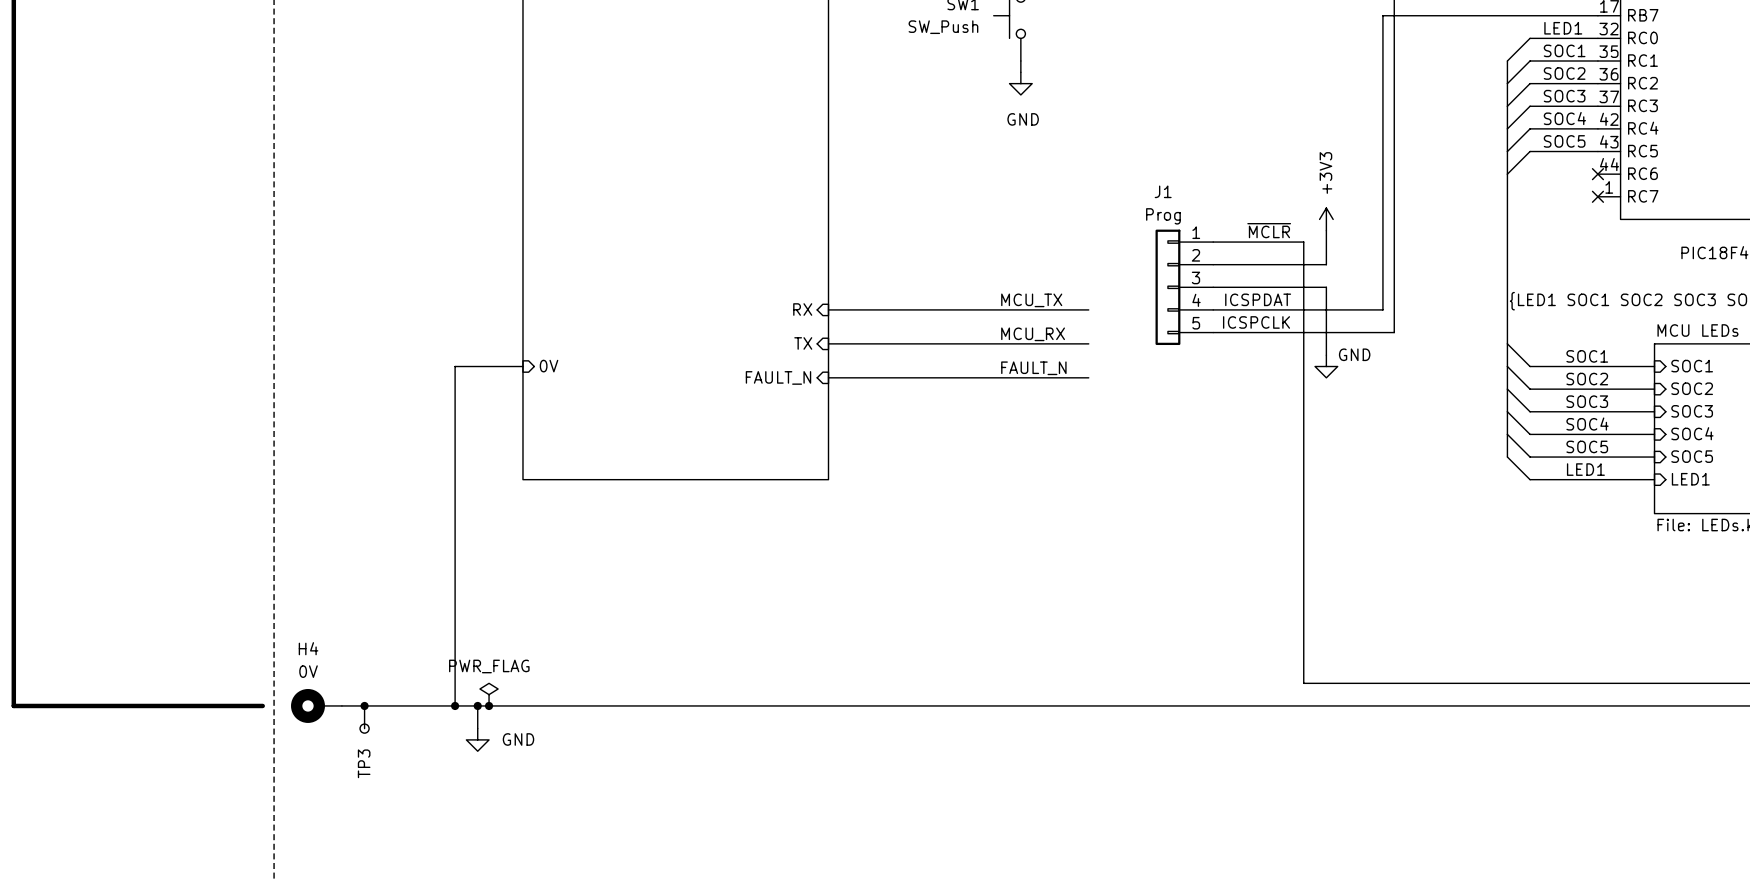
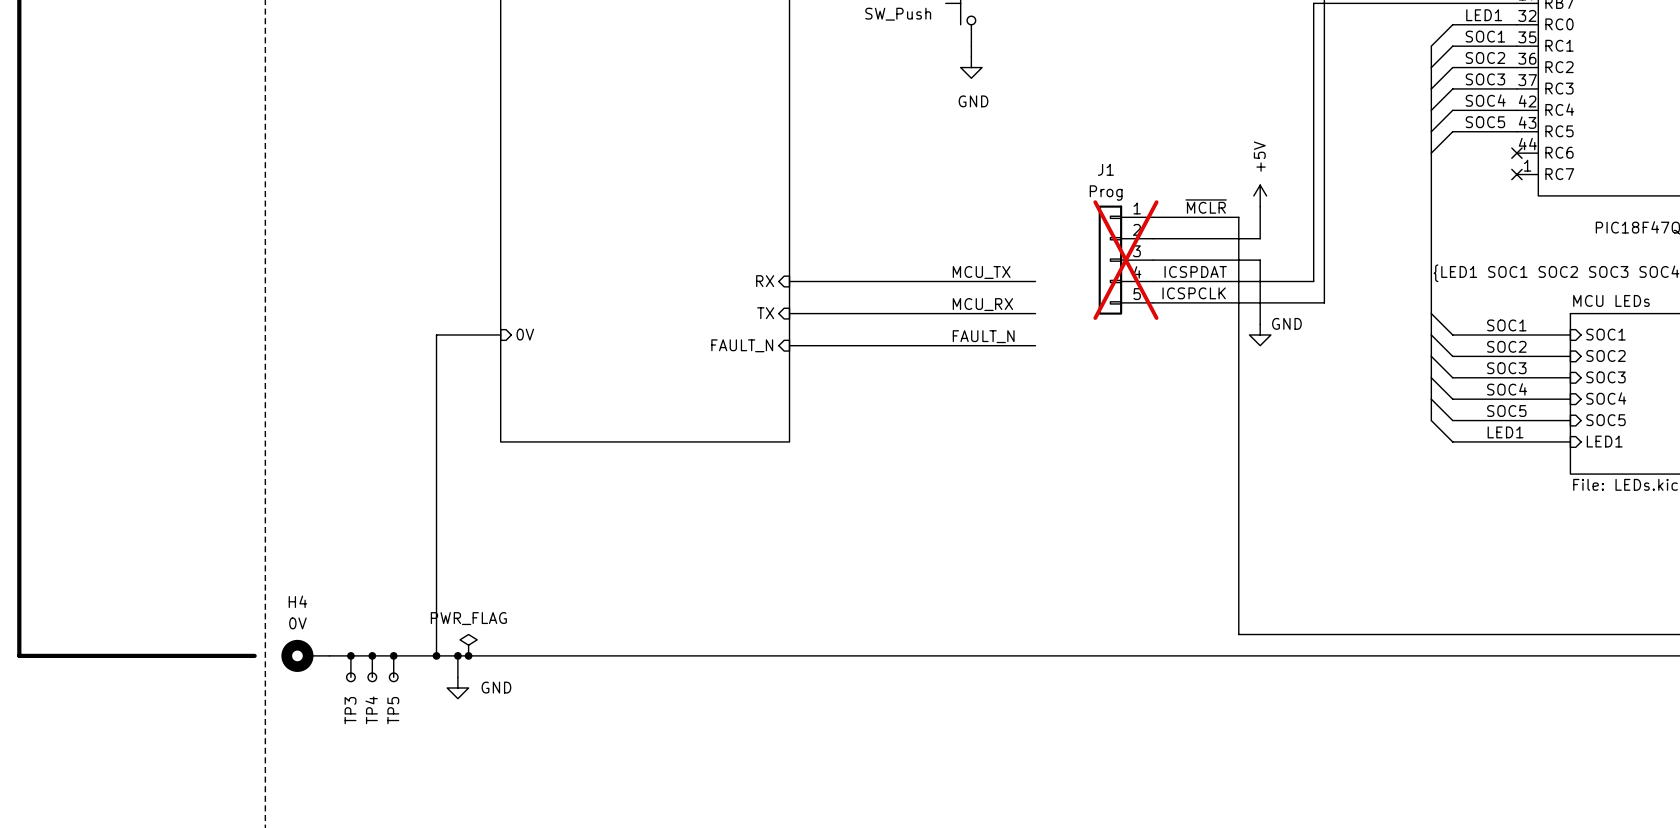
power symbol: +3V3 (1326, 219) -> +5V (1260, 195)
J1 do-not-place cross: none -> (1125, 260)
wire: none -> (372, 655) (372, 677)
junction: none -> (372, 655)
wire: none -> (393, 655) (393, 677)
junction: none -> (393, 655)
TP4: none -> (372, 677)
TP5: none -> (393, 677)

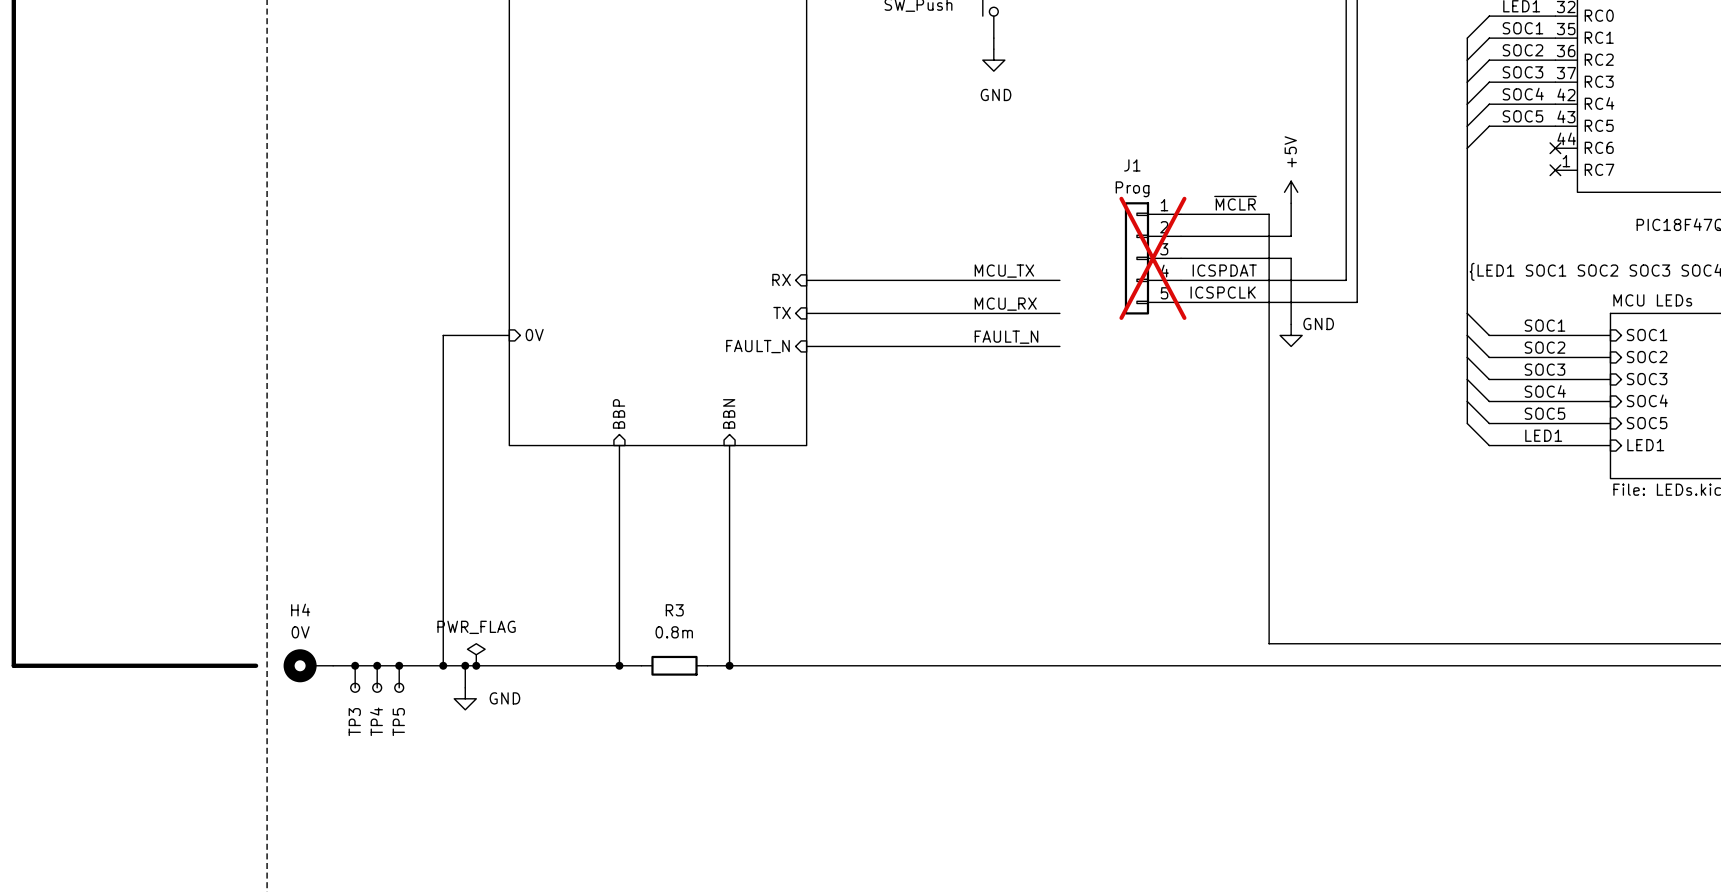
sheet pin: none -> BBP (619, 413)
sheet pin: none -> BBN (729, 413)
wire: none -> (619, 445) (619, 665)
wire: none -> (729, 445) (729, 665)
junction: none -> (619, 665)
wire: (629, 655) (693, 655) -> none
R3: none -> 0.8m (674, 665)
junction: none -> (729, 665)

